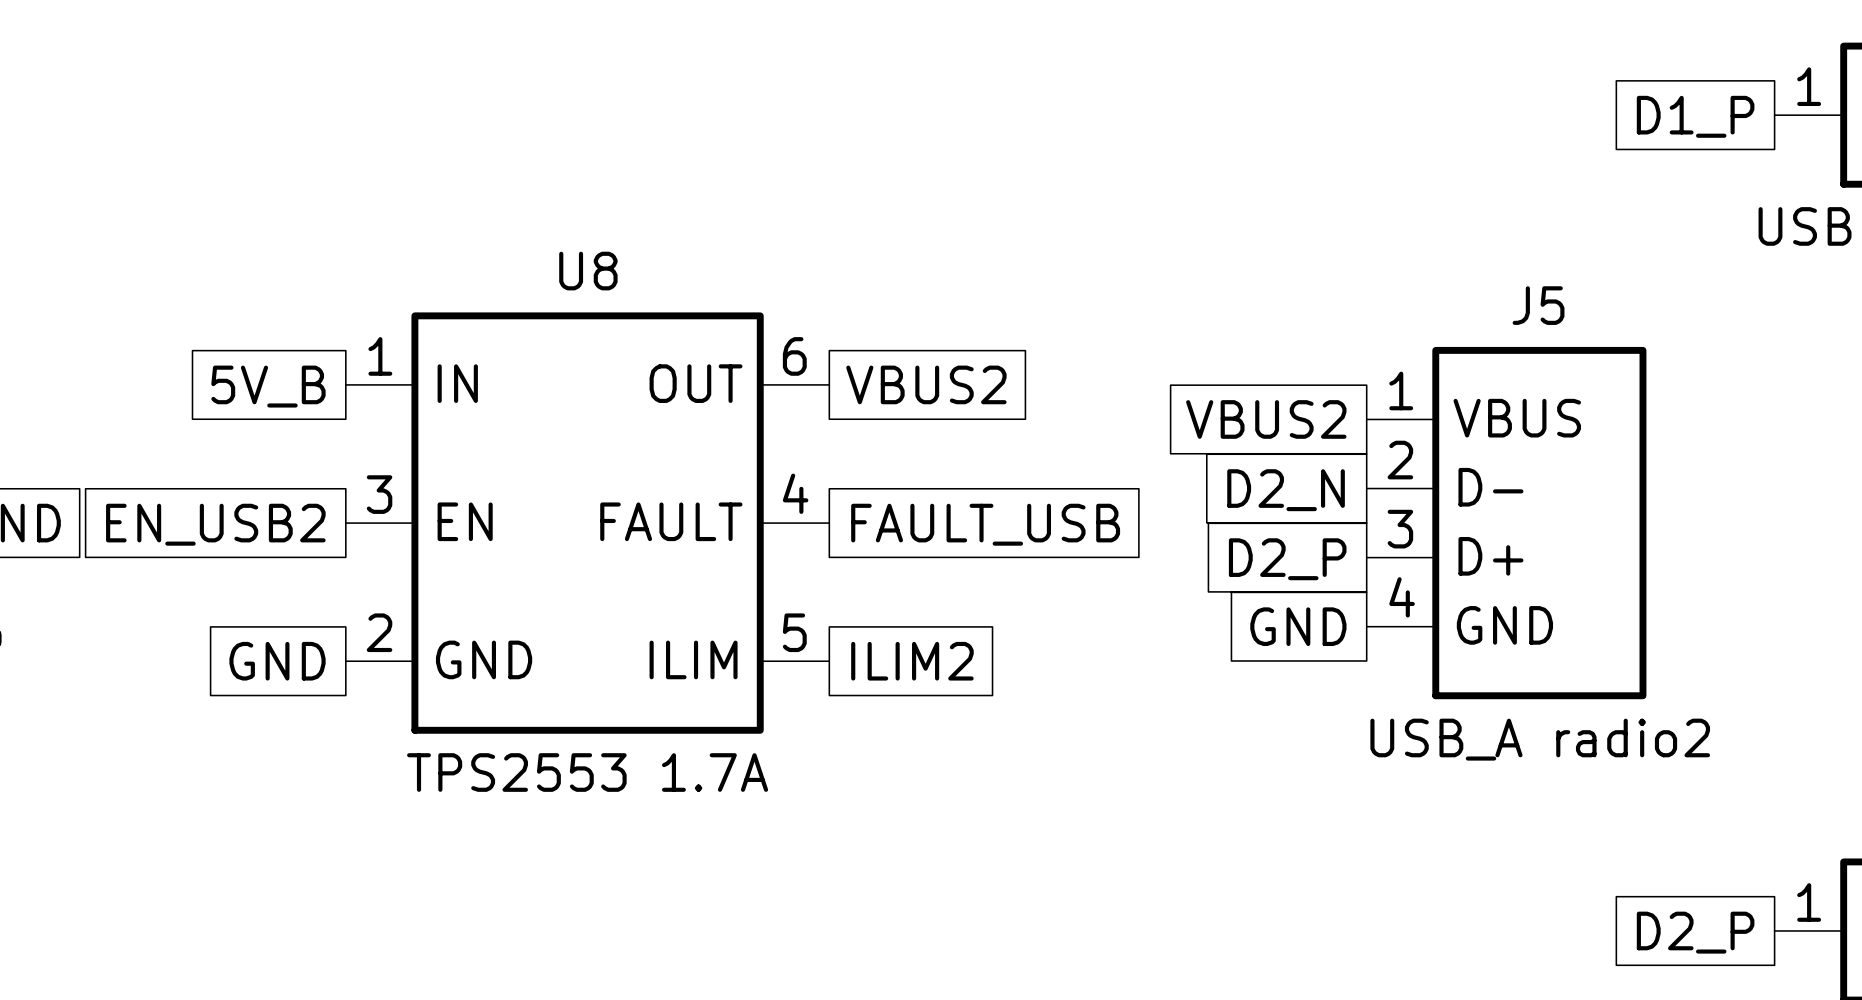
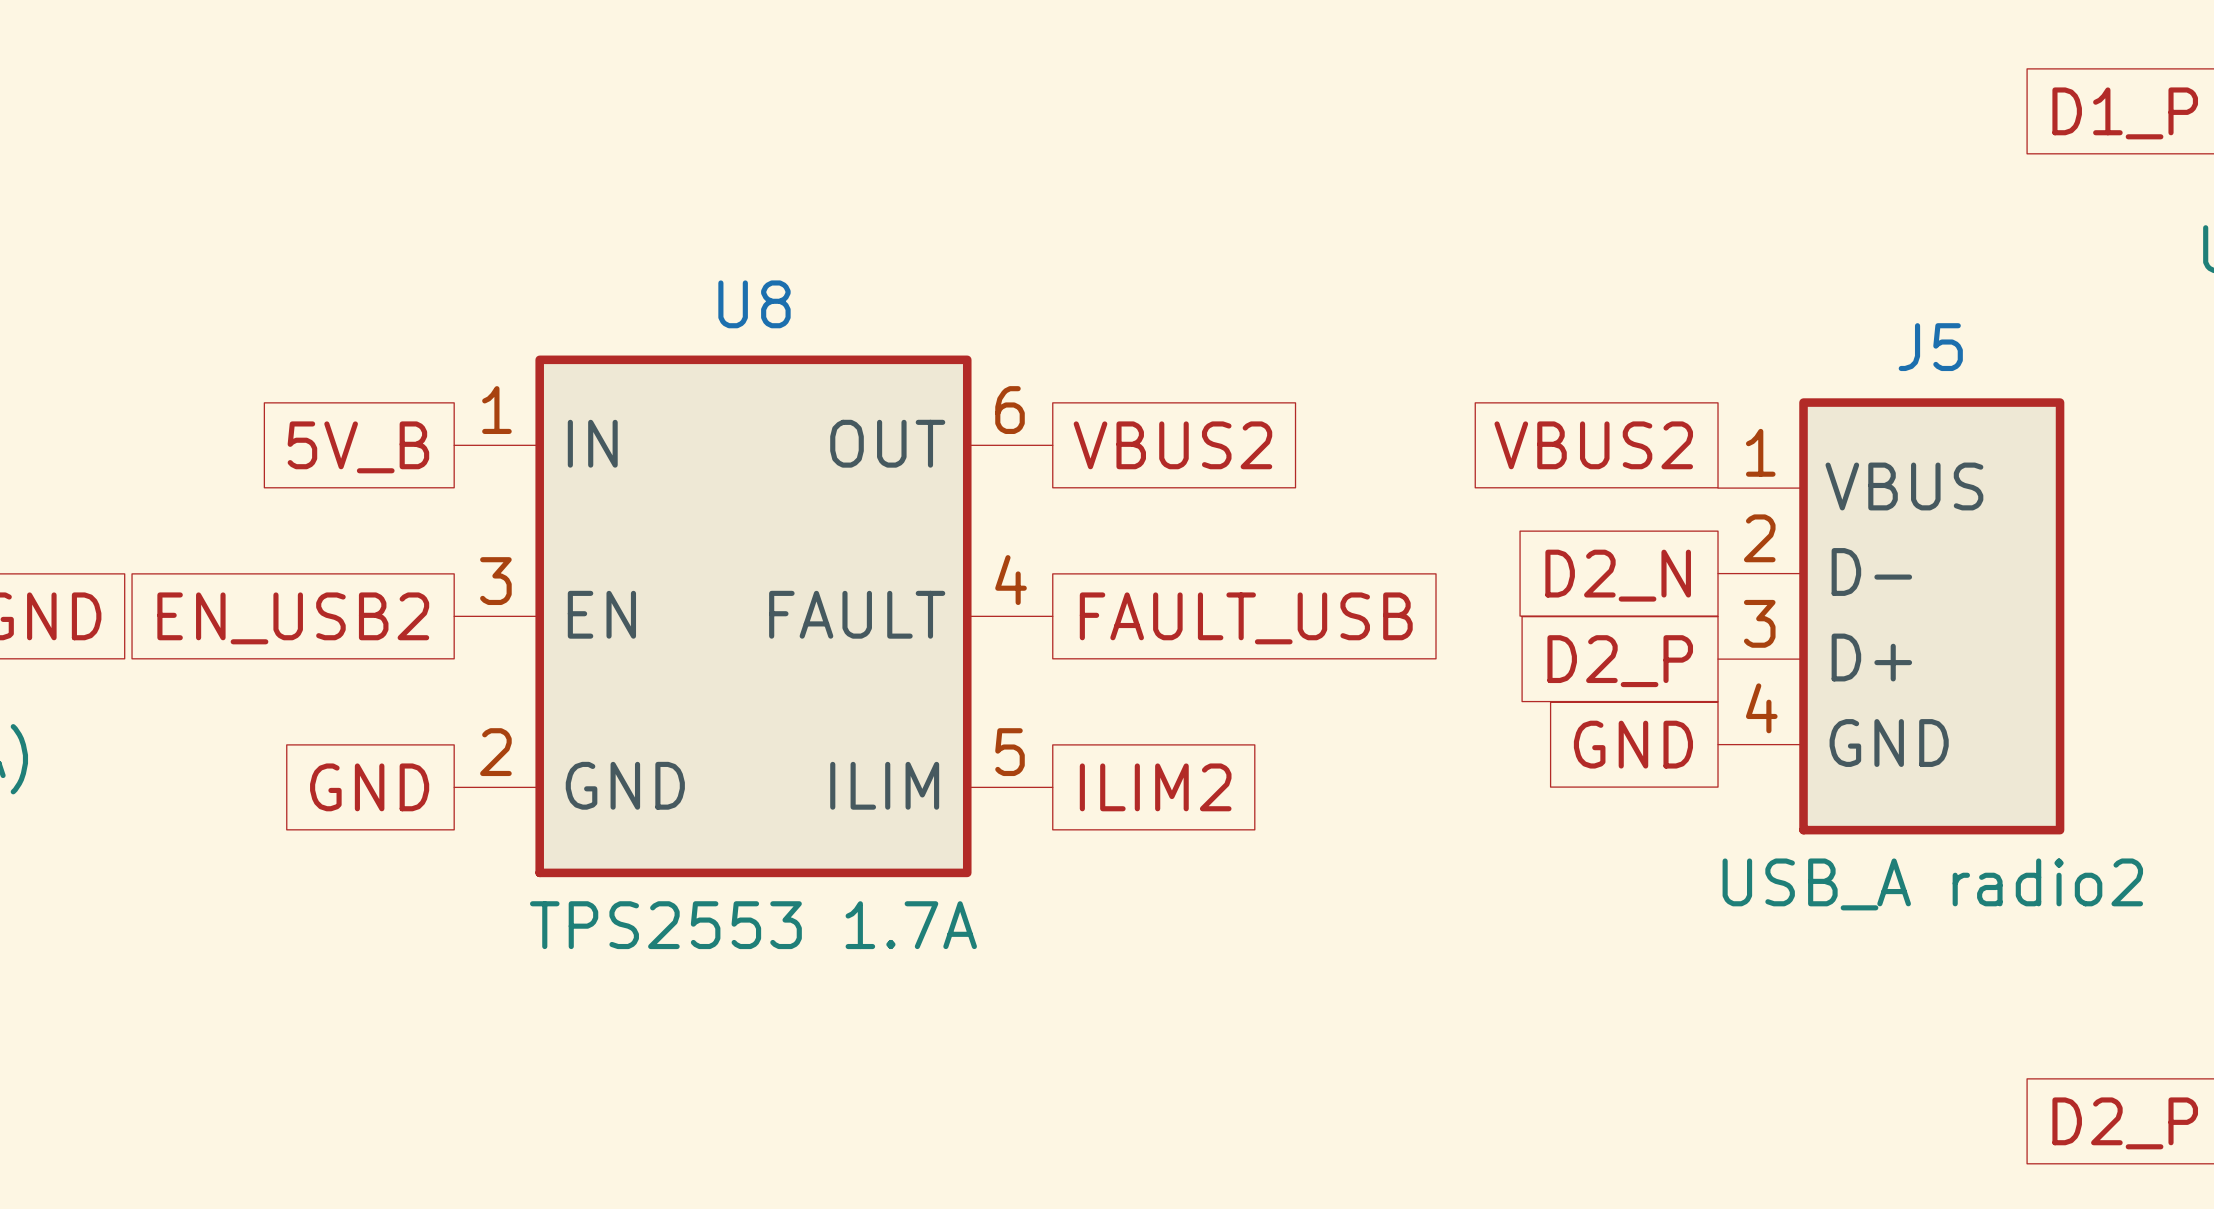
global label position: VBUS2 (1266, 419) -> VBUS2 (1593, 445)

